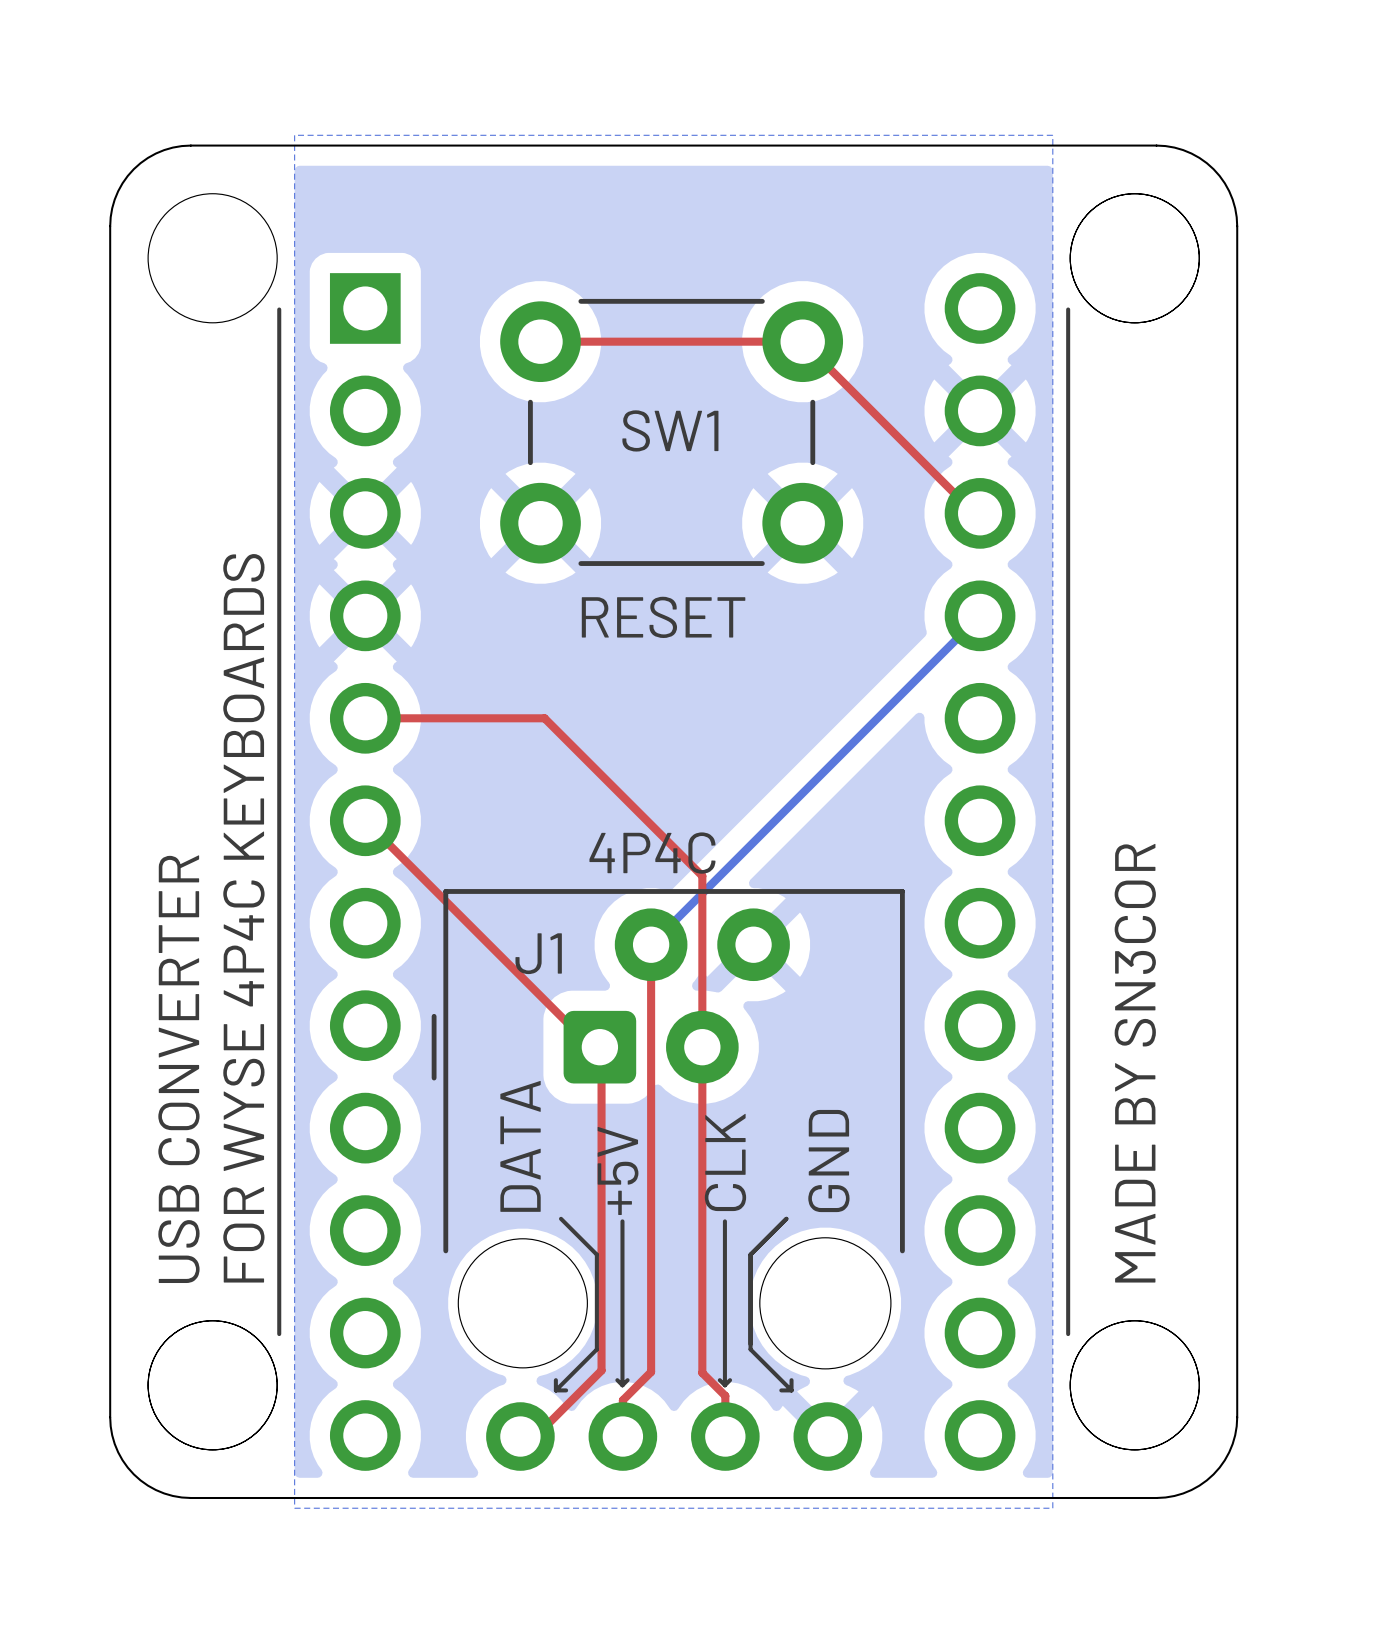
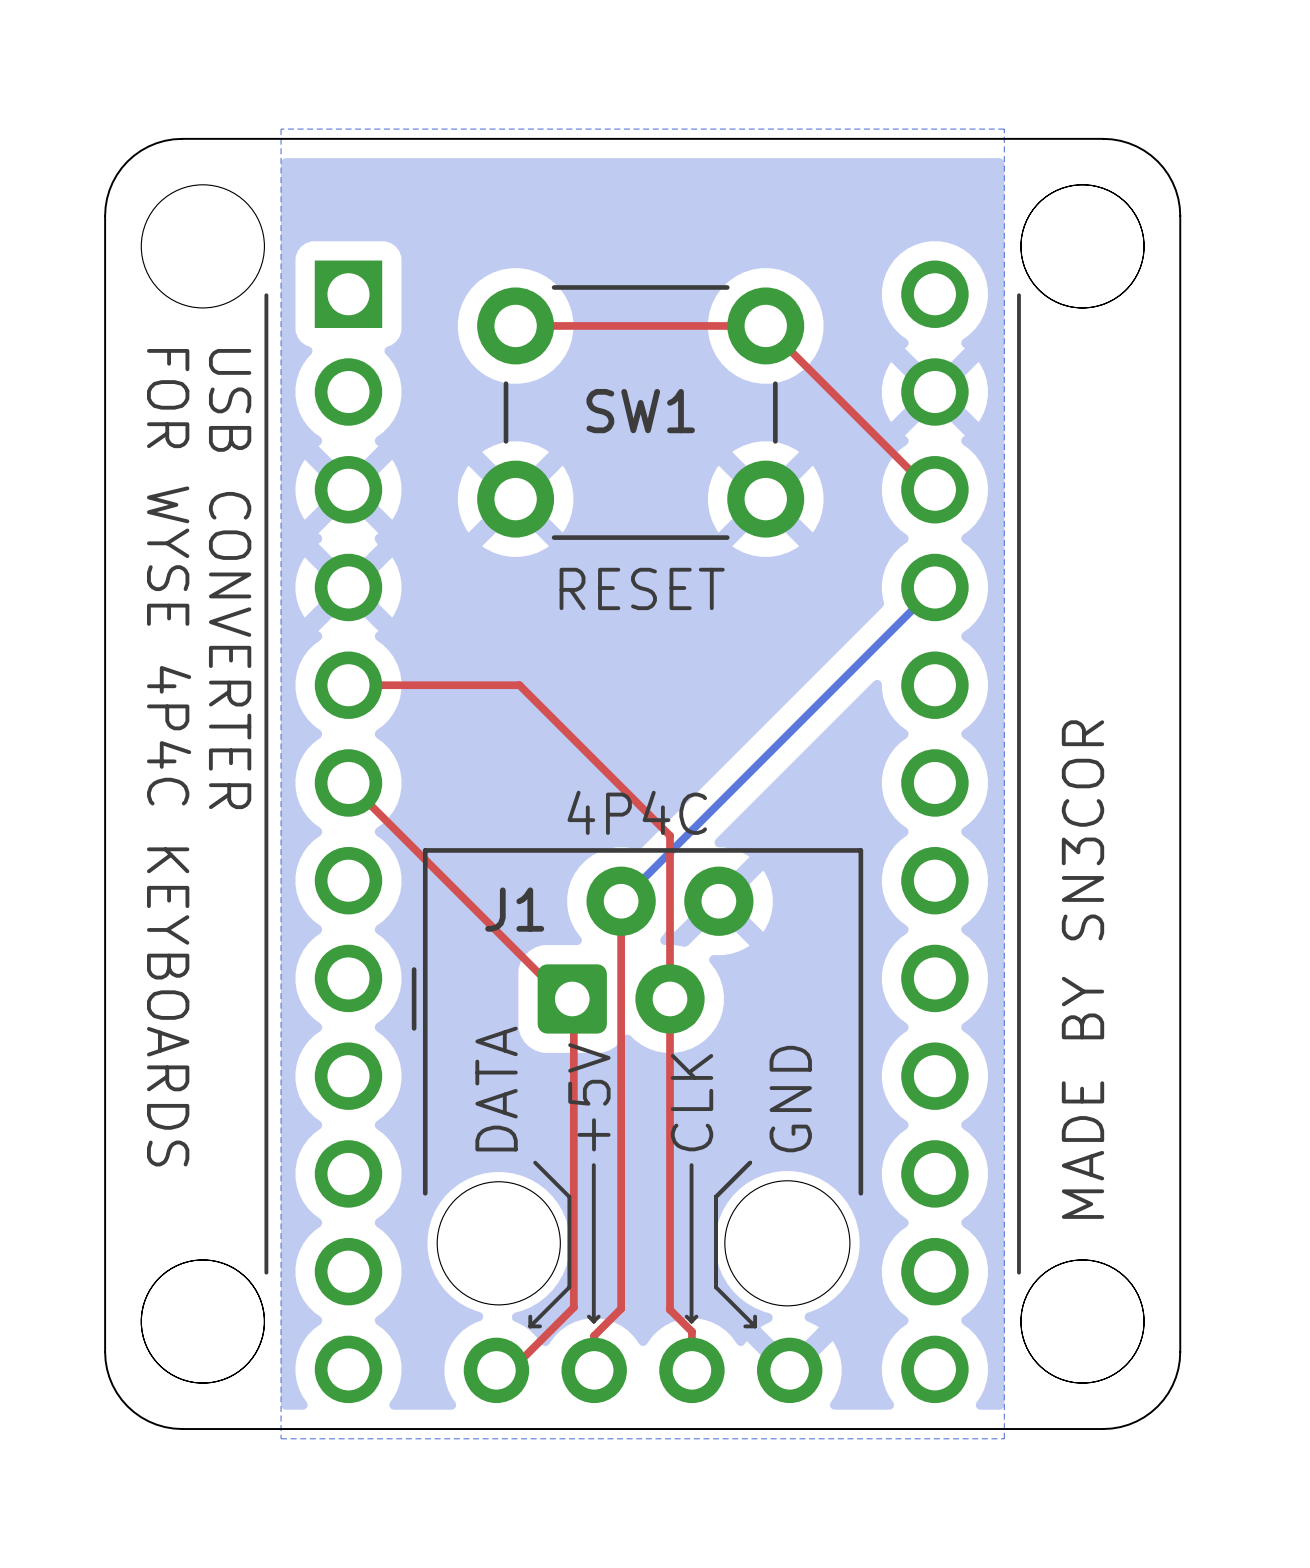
text rotation: 0° (243, 918) -> 180° (169, 757)
text rotation: 0° (178, 1069) -> 180° (230, 579)

